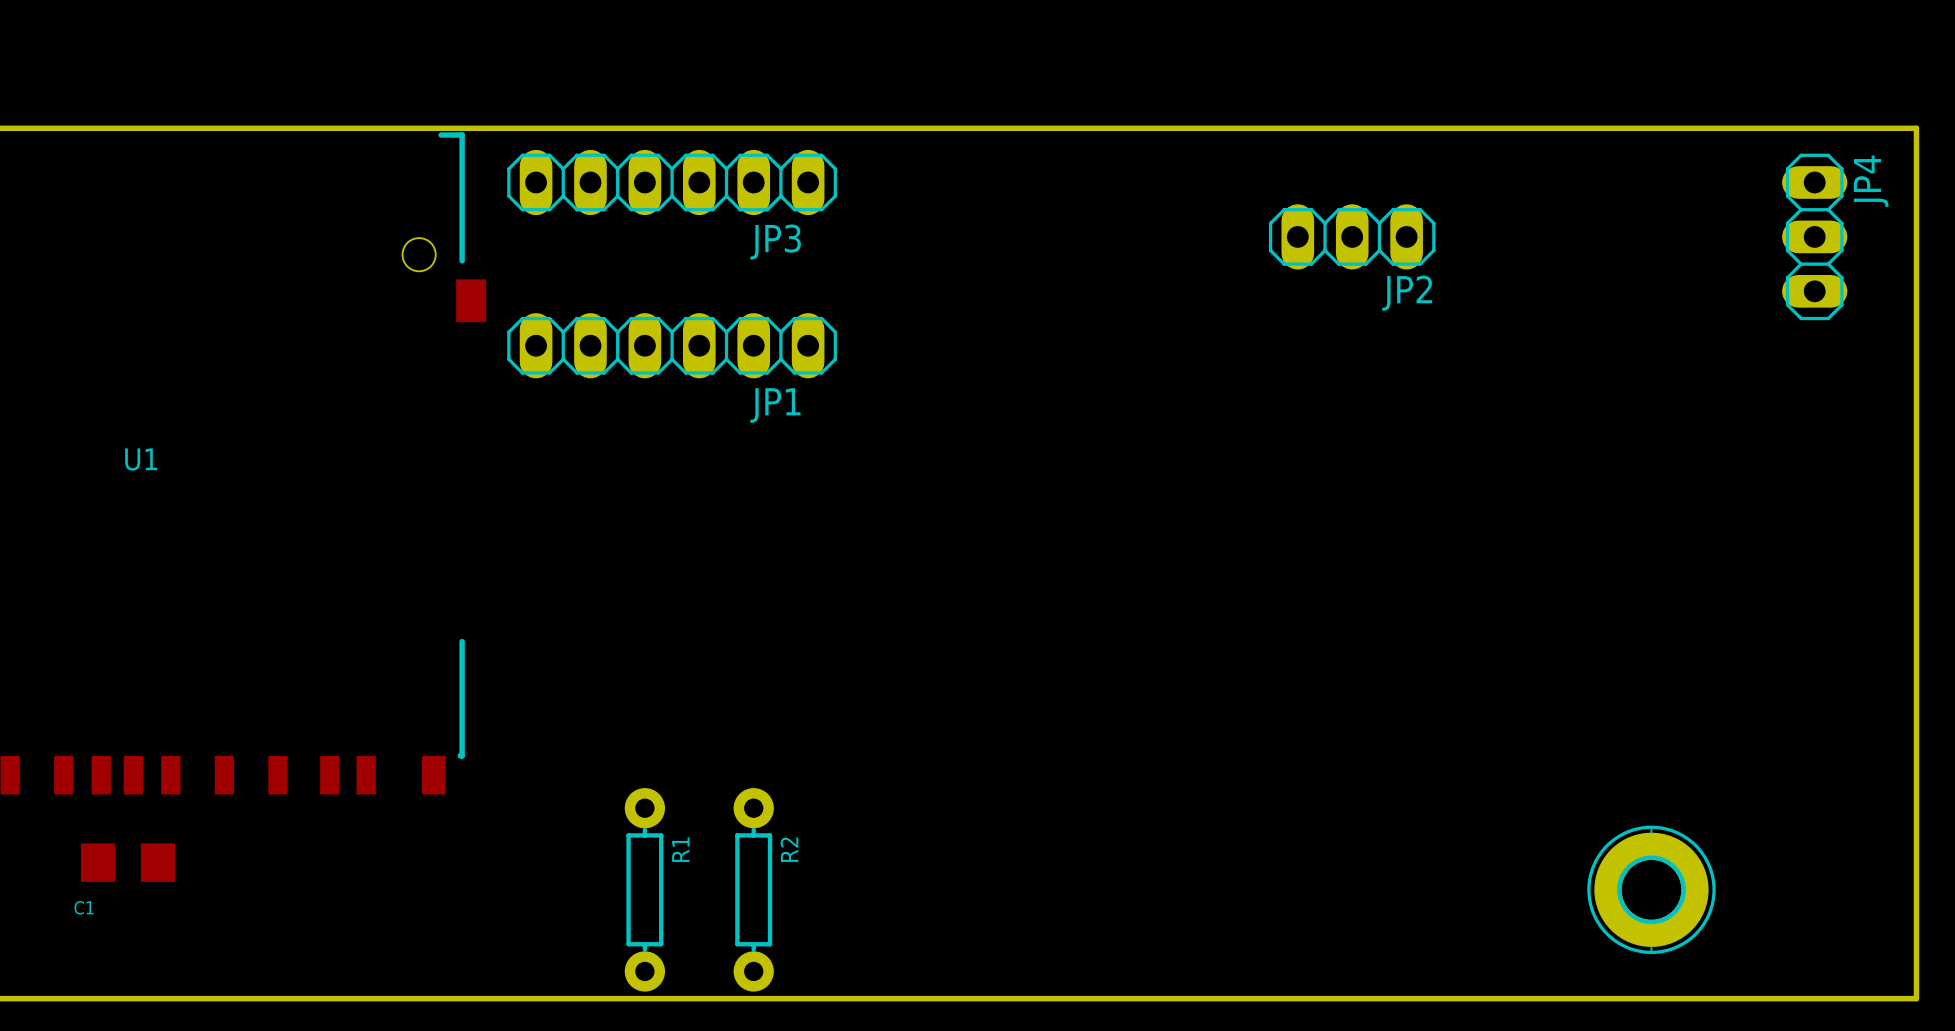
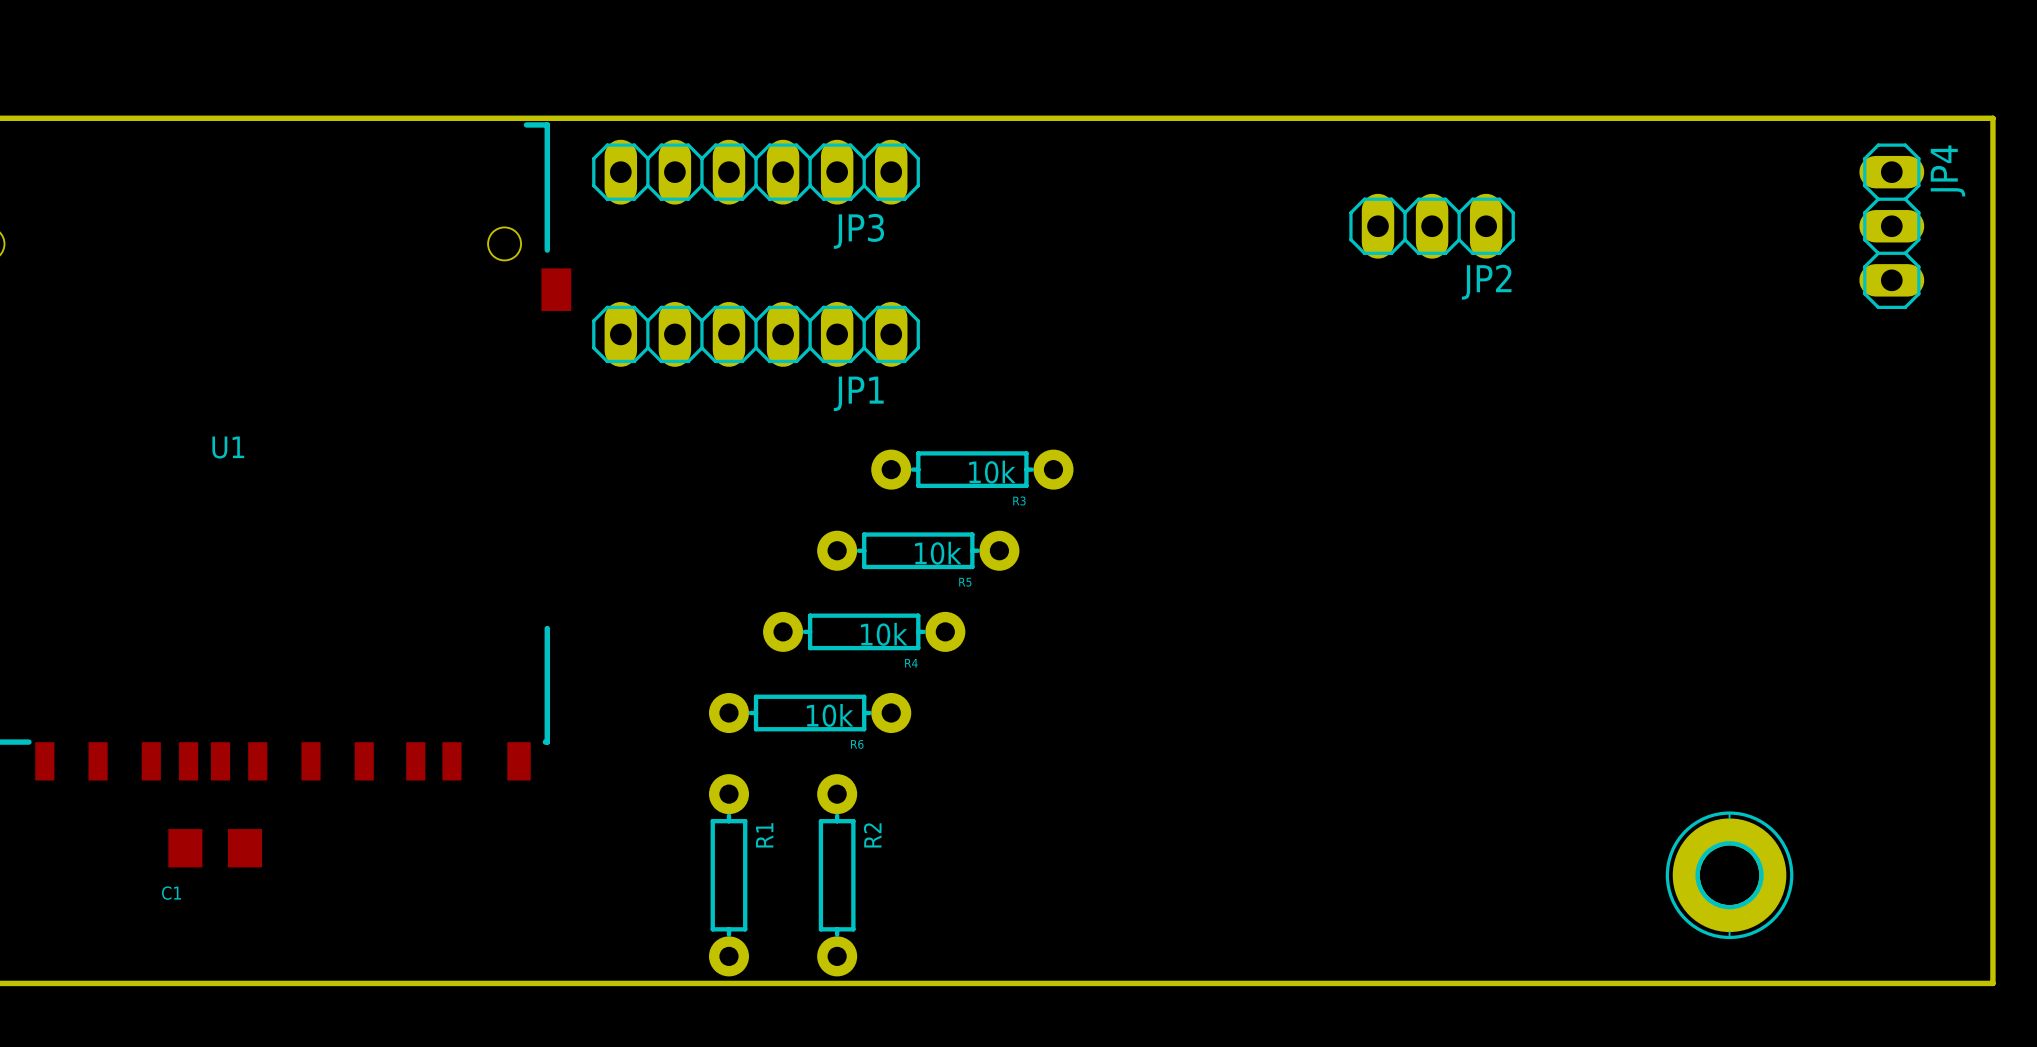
R3: none -> 10k (972, 469)
R5: none -> 10k (918, 550)
R4: none -> 10k (864, 631)
R6: none -> 10k (810, 713)

